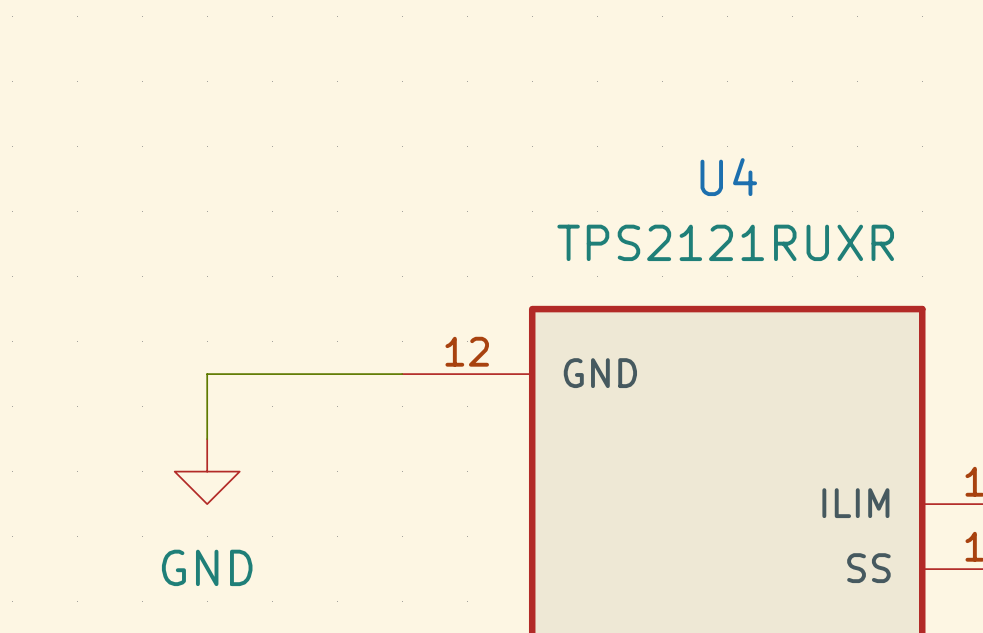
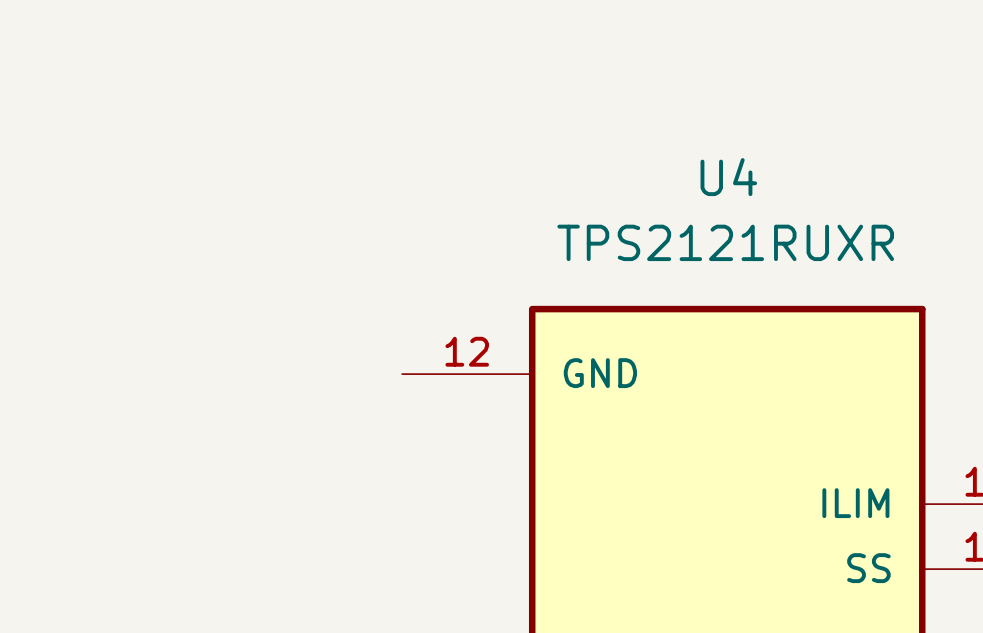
wire: (402, 374) (207, 374) (207, 439) -> none
power symbol: GND (207, 471) -> none

